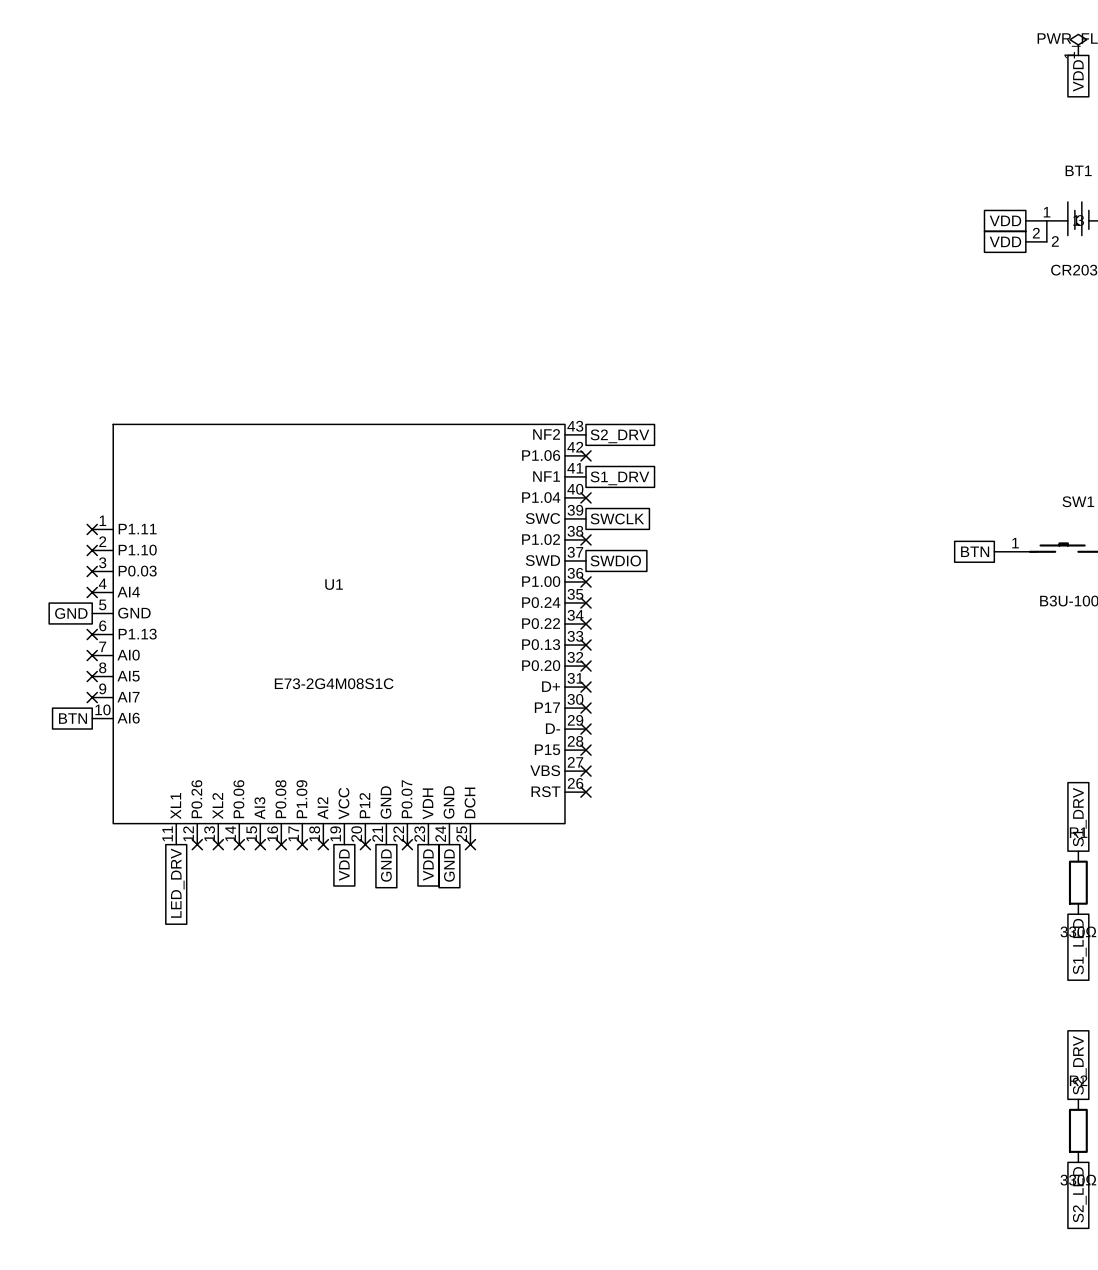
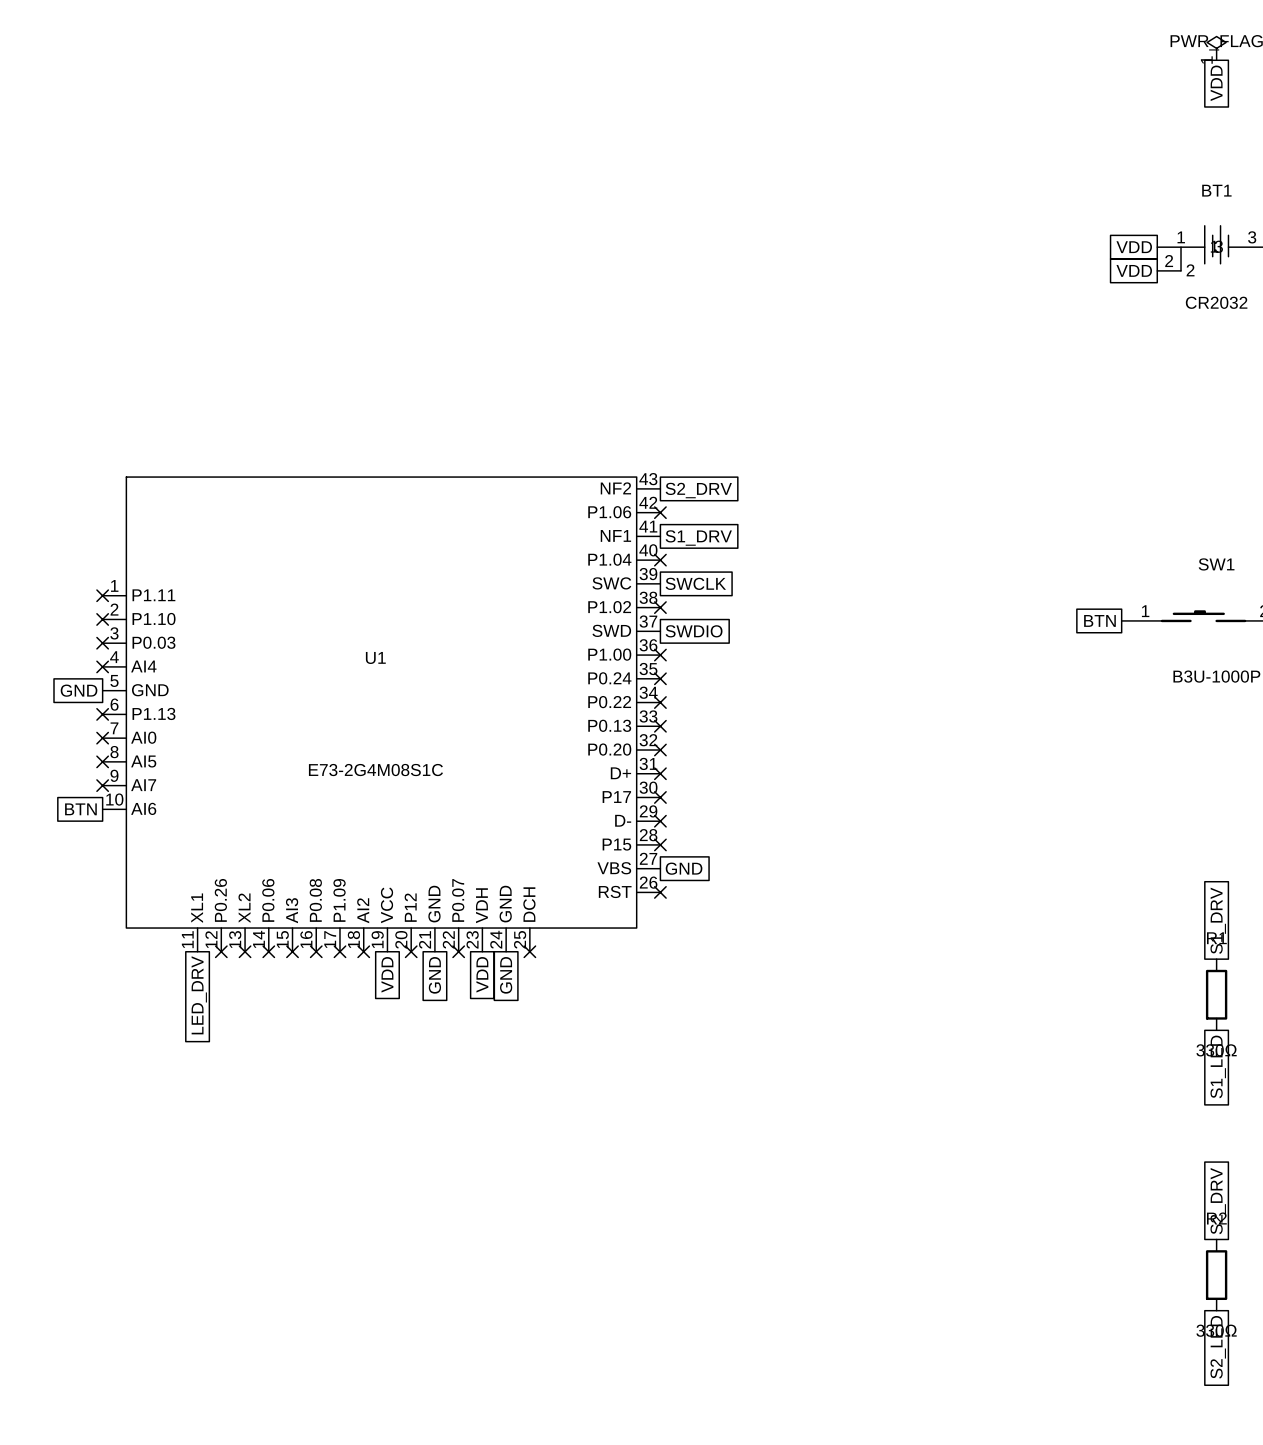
no-connect mark: (586, 771) -> none
global label: none -> GND (684, 868)

